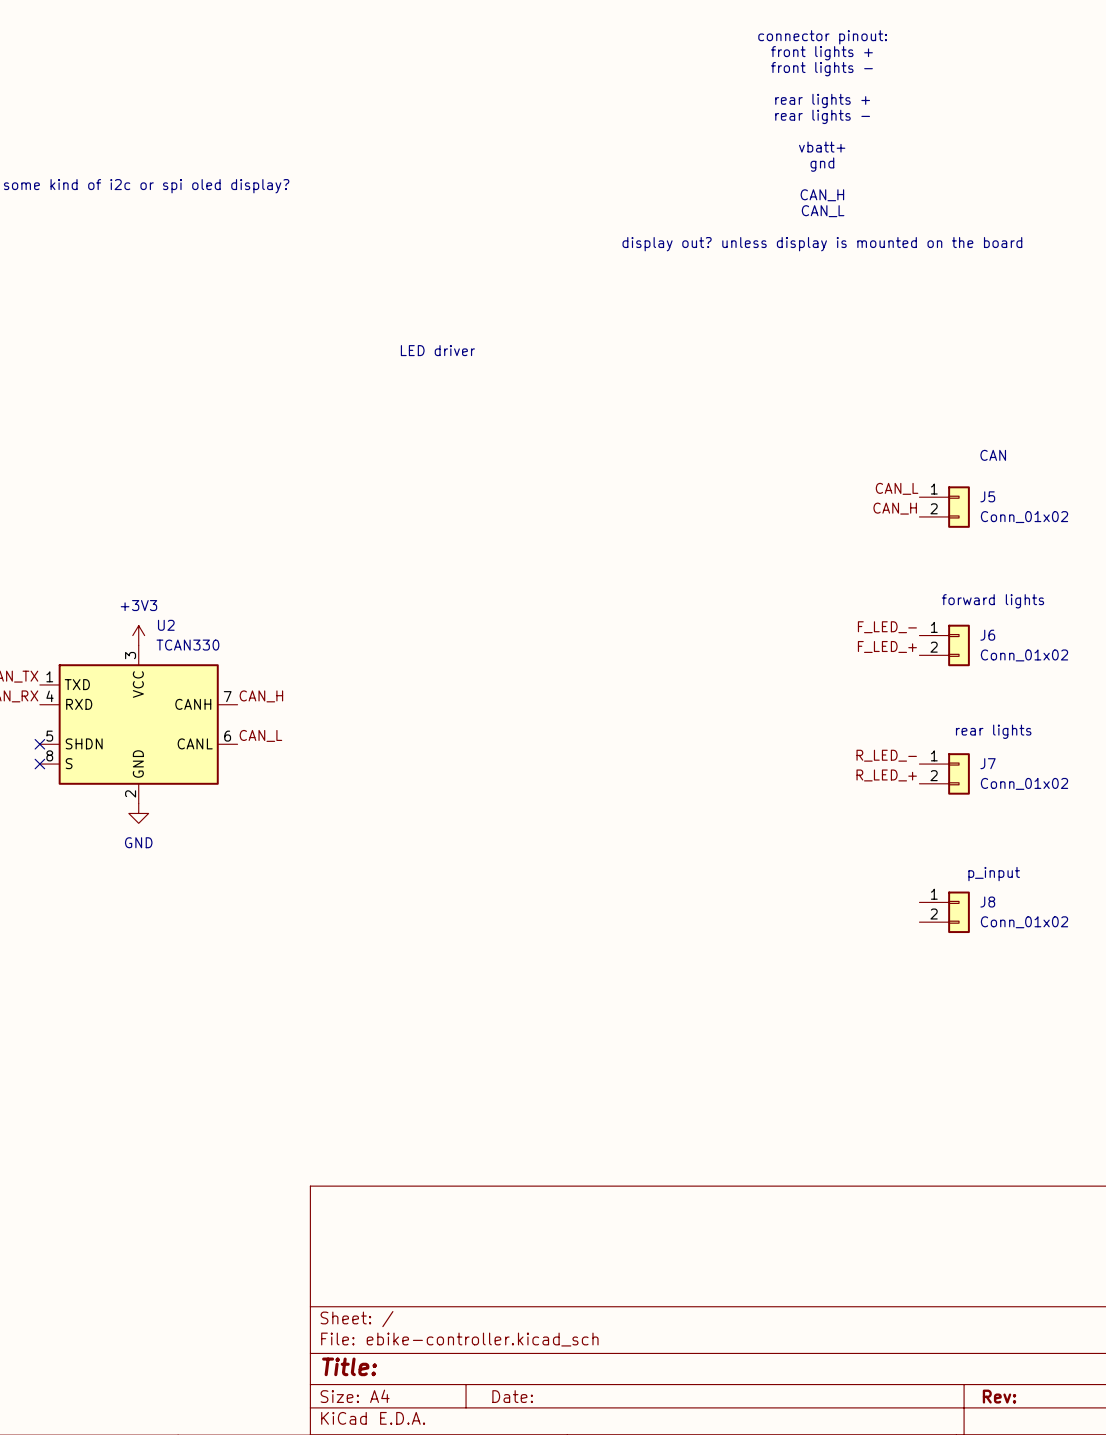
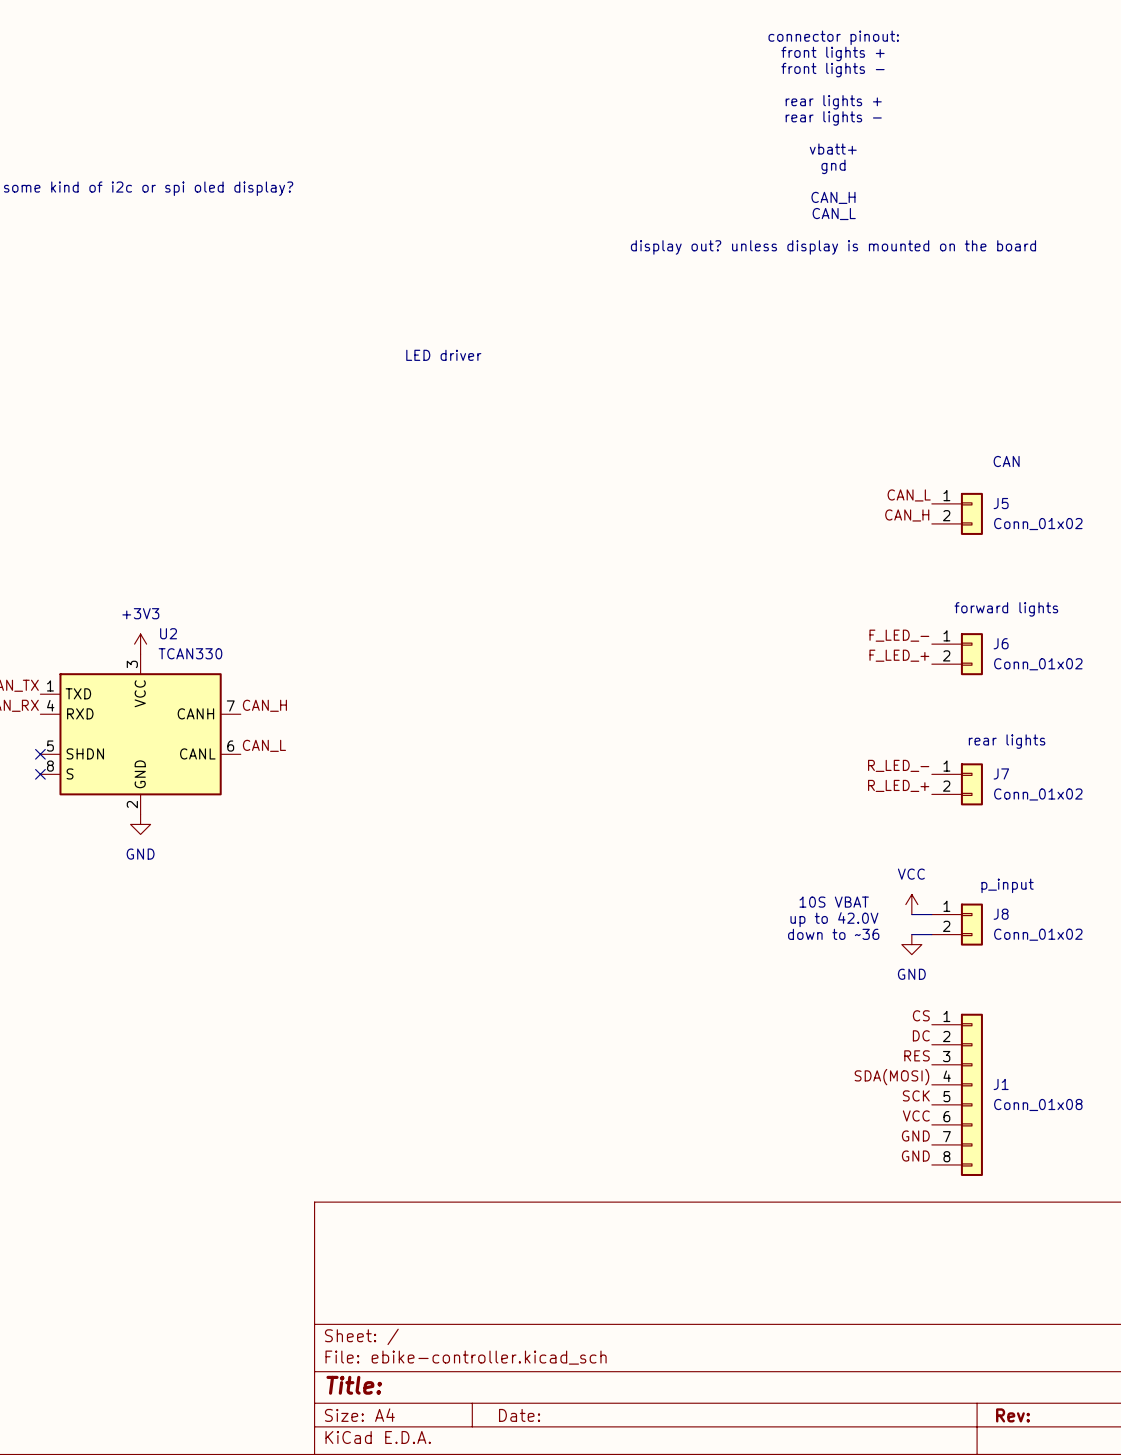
text: none -> 10S VBAT (834, 902)
power symbol: none -> VCC (911, 904)
wire: none -> (911, 914) (931, 914)
text: none -> up to 42.0V (834, 919)
text: none -> down to ~36 (833, 934)
wire: none -> (911, 934) (931, 934)
power symbol: none -> GND (911, 944)
label: none -> CS (921, 1015)
label: none -> DC (921, 1035)
label: none -> RES (917, 1055)
label: none -> SDA(MOSI) (891, 1077)
J1: none -> Conn_01x08 (957, 1094)
label: none -> SCK (916, 1095)
label: none -> VCC (916, 1115)
label: none -> GND (915, 1136)
label: none -> GND (915, 1156)

